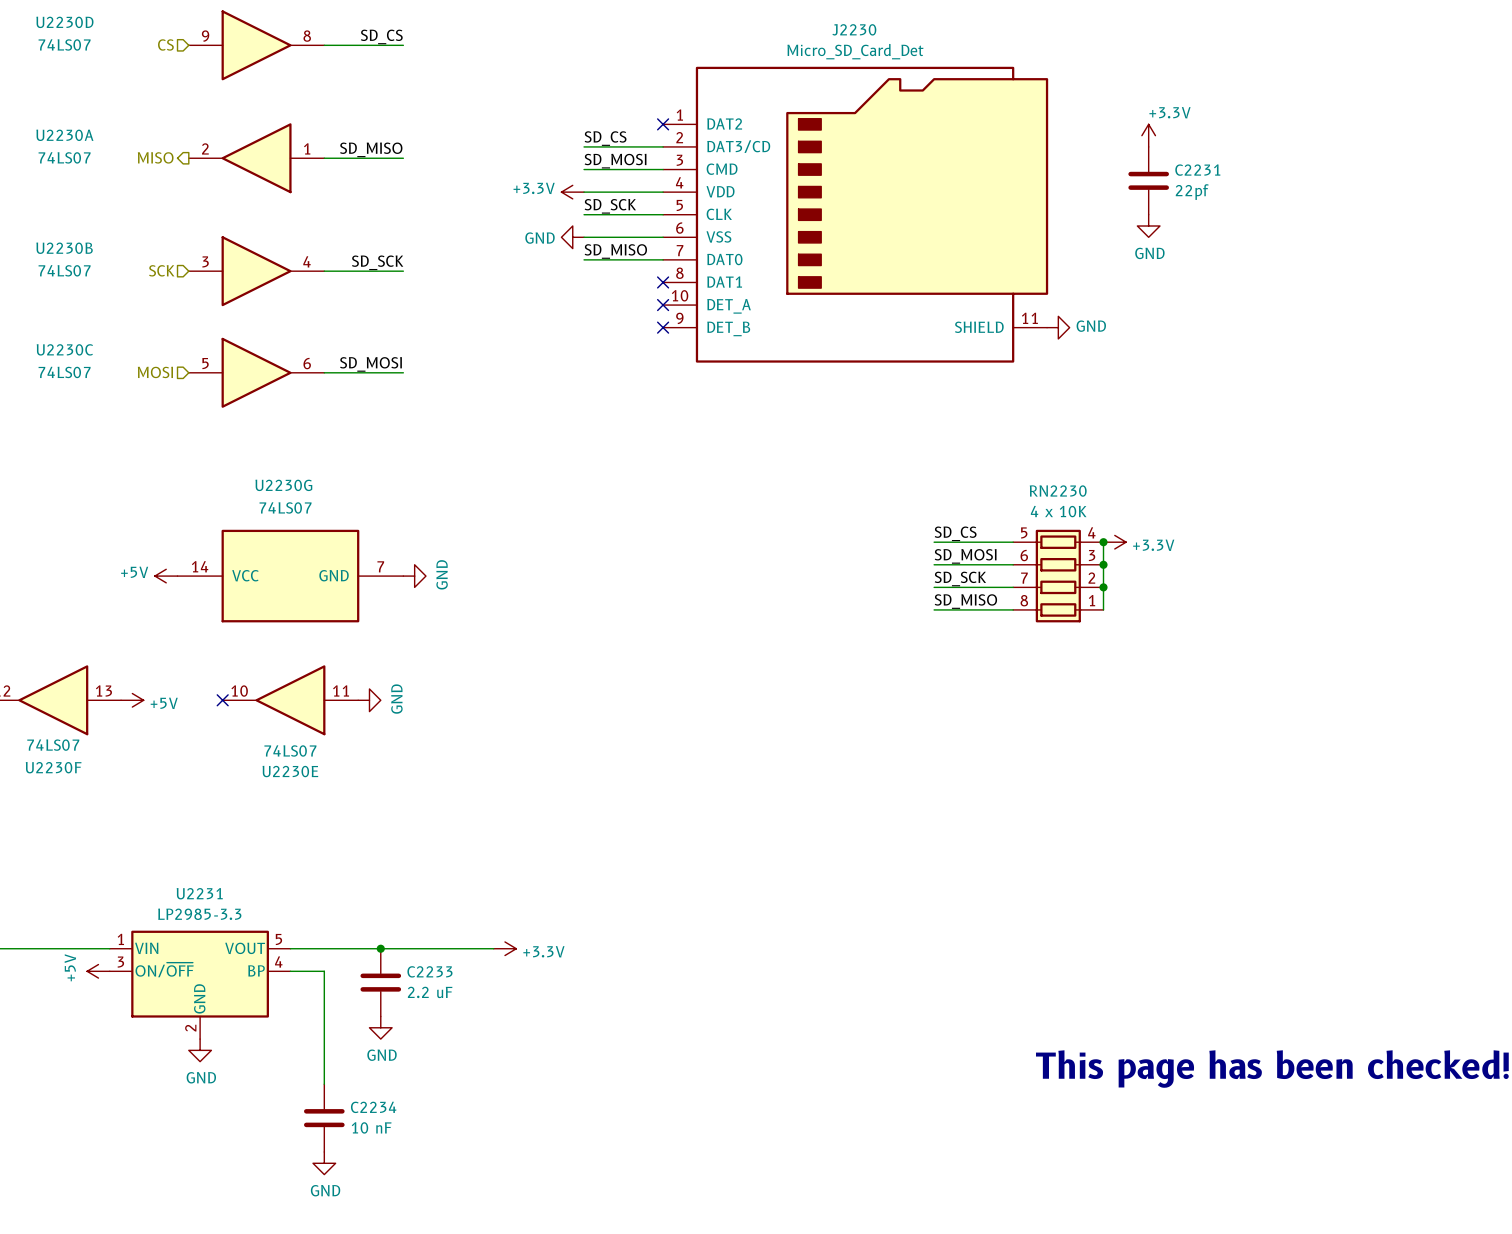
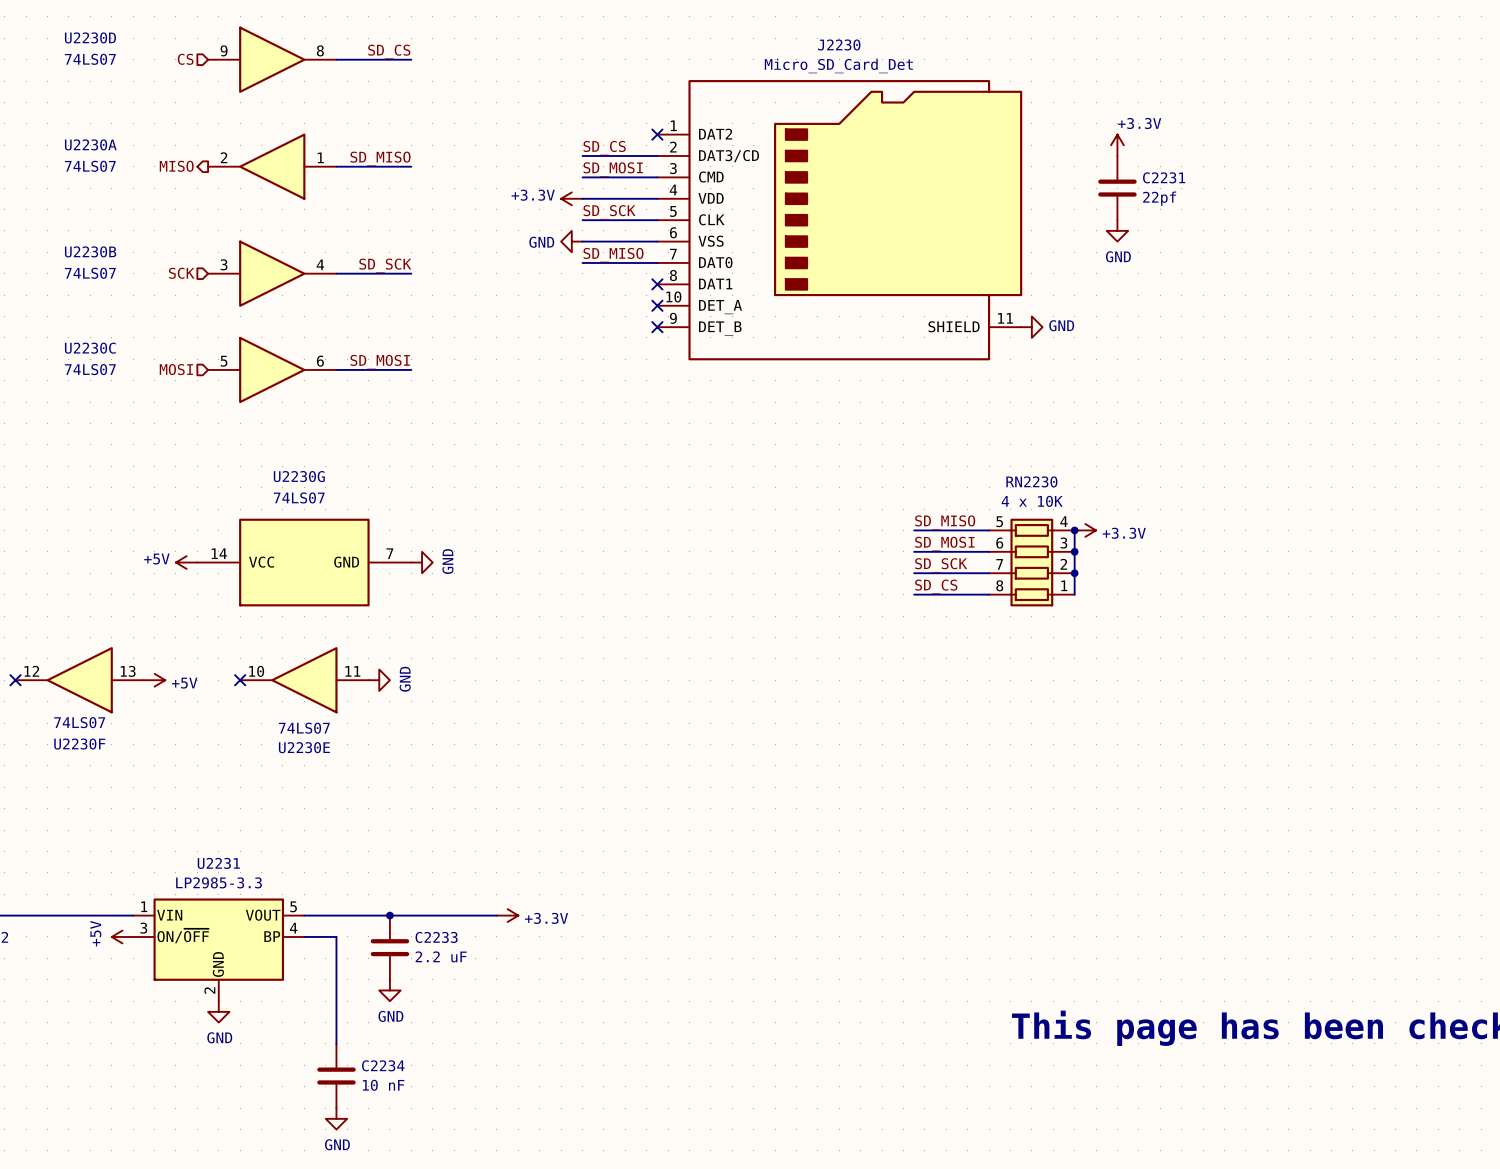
label: SD_CS (955, 533) -> SD_MISO (945, 522)
label: SD_MISO (965, 601) -> SD_CS (936, 586)

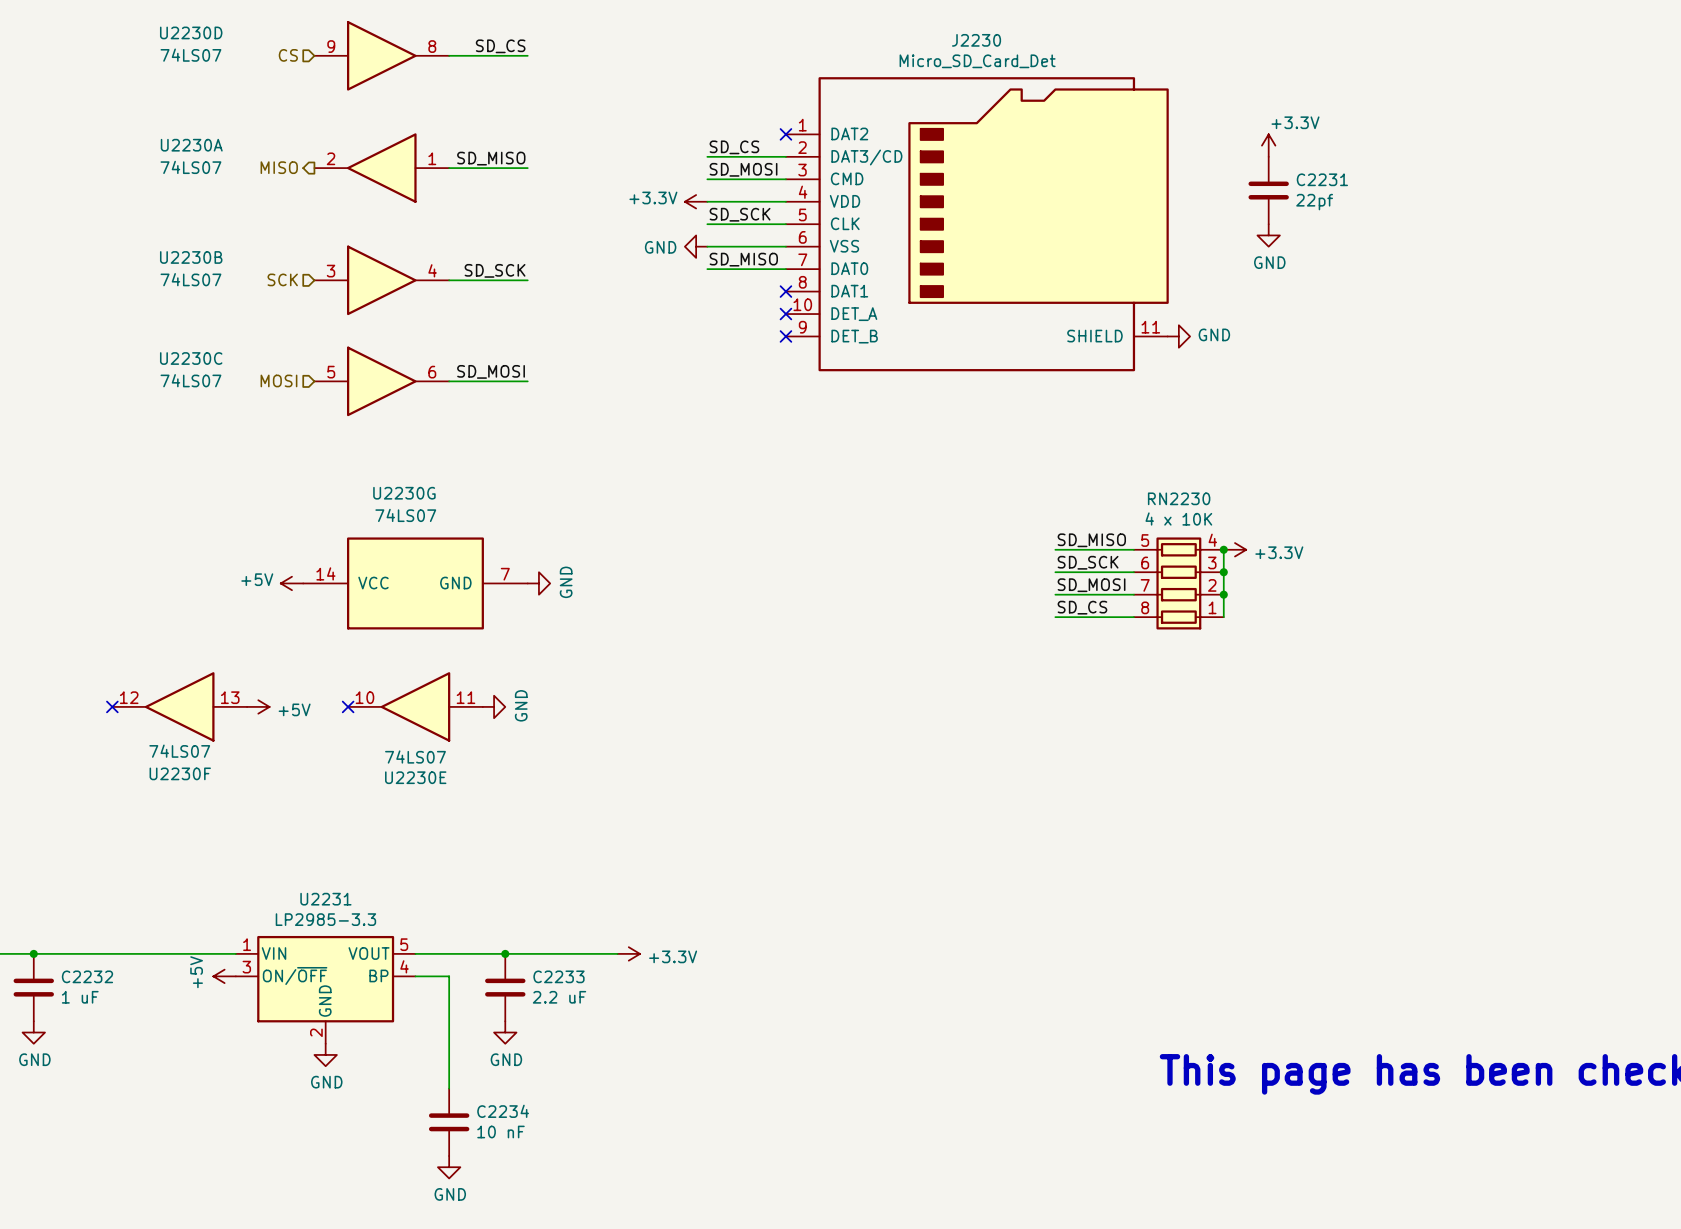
label: SD_MOSI (944, 543) -> SD_SCK (1088, 562)
label: SD_SCK (941, 565) -> SD_MOSI (1091, 585)

